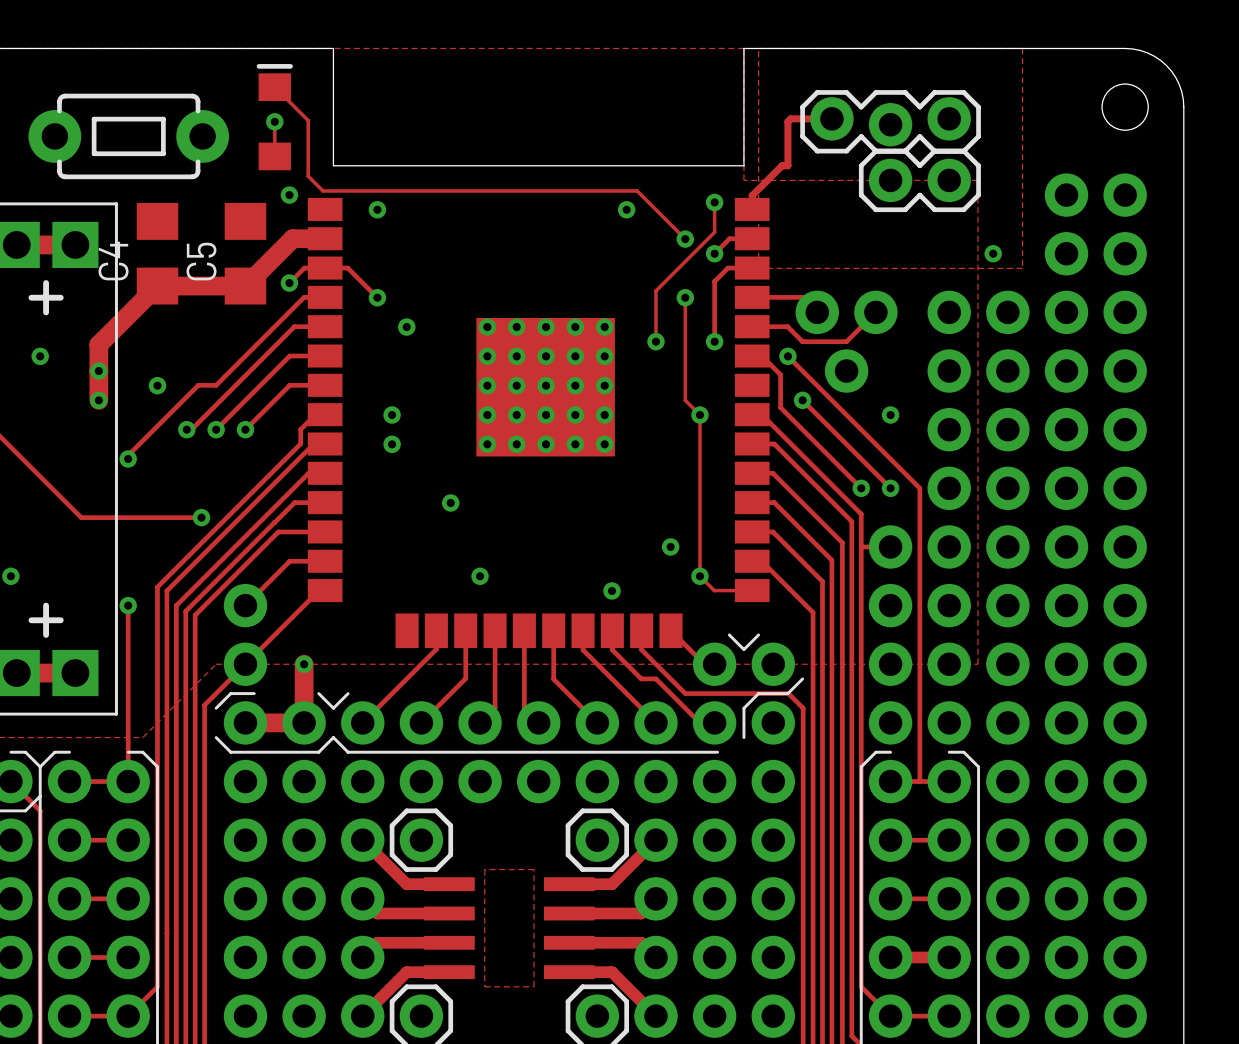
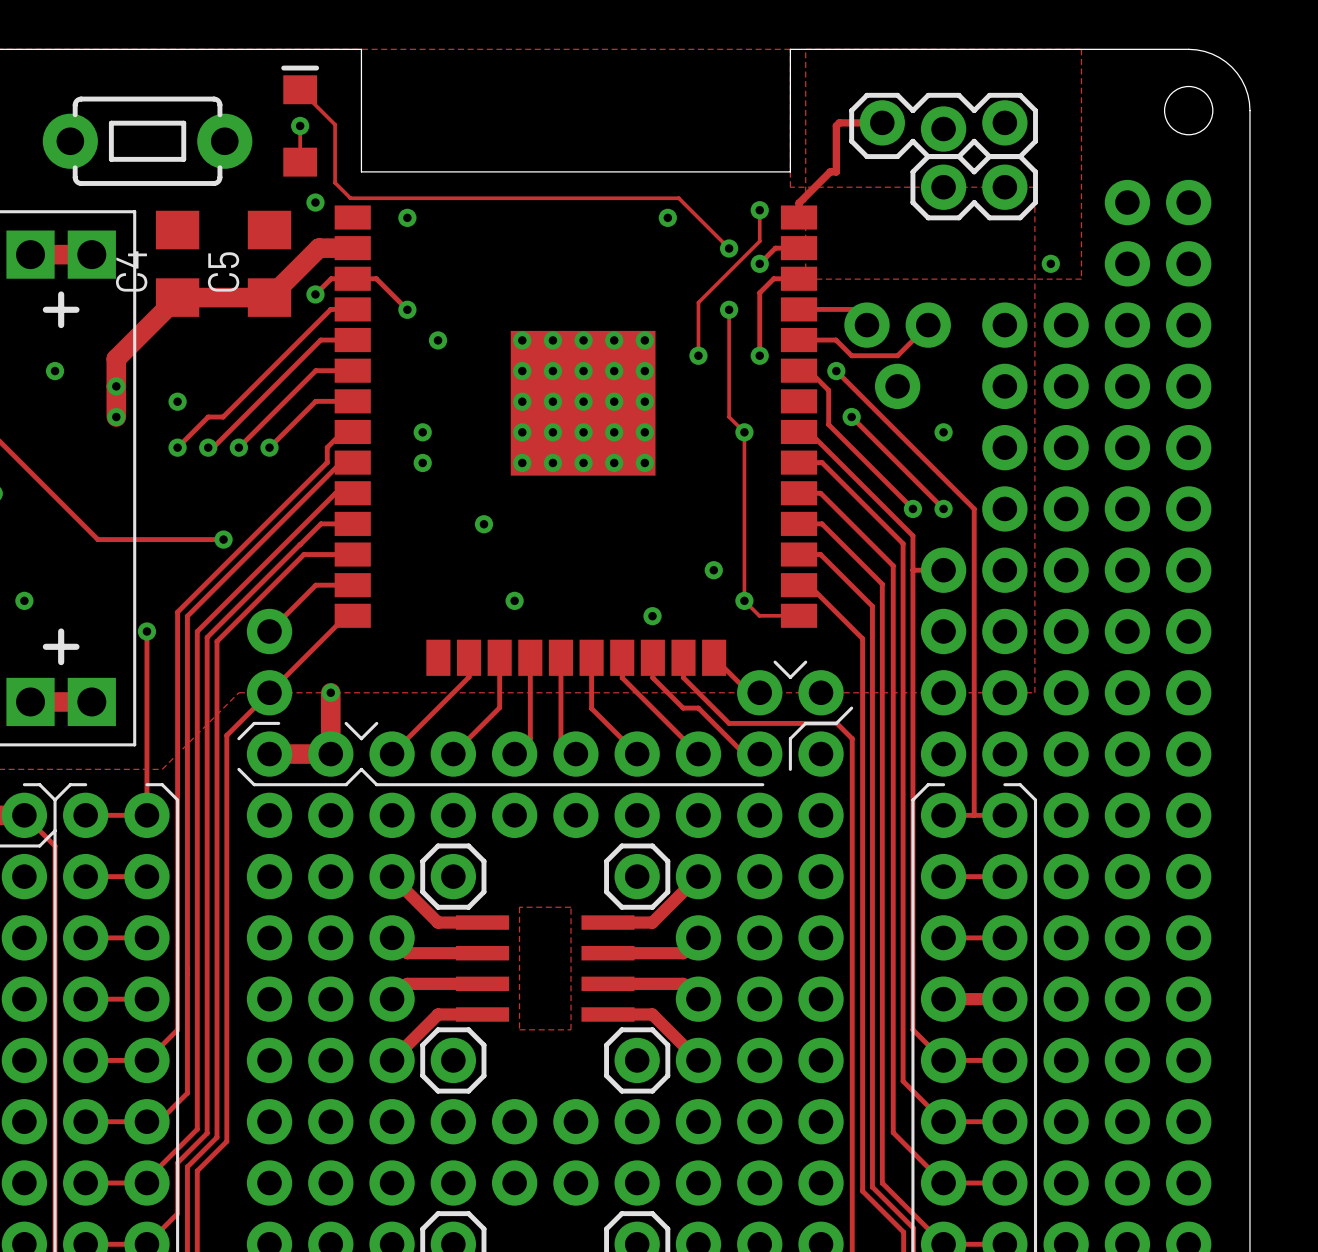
track: (216, 385) (198, 385) (128, 455) (128, 459) -> (238, 401) (223, 417) (208, 417) (177, 447)
via position: (128, 459) -> (177, 447)

